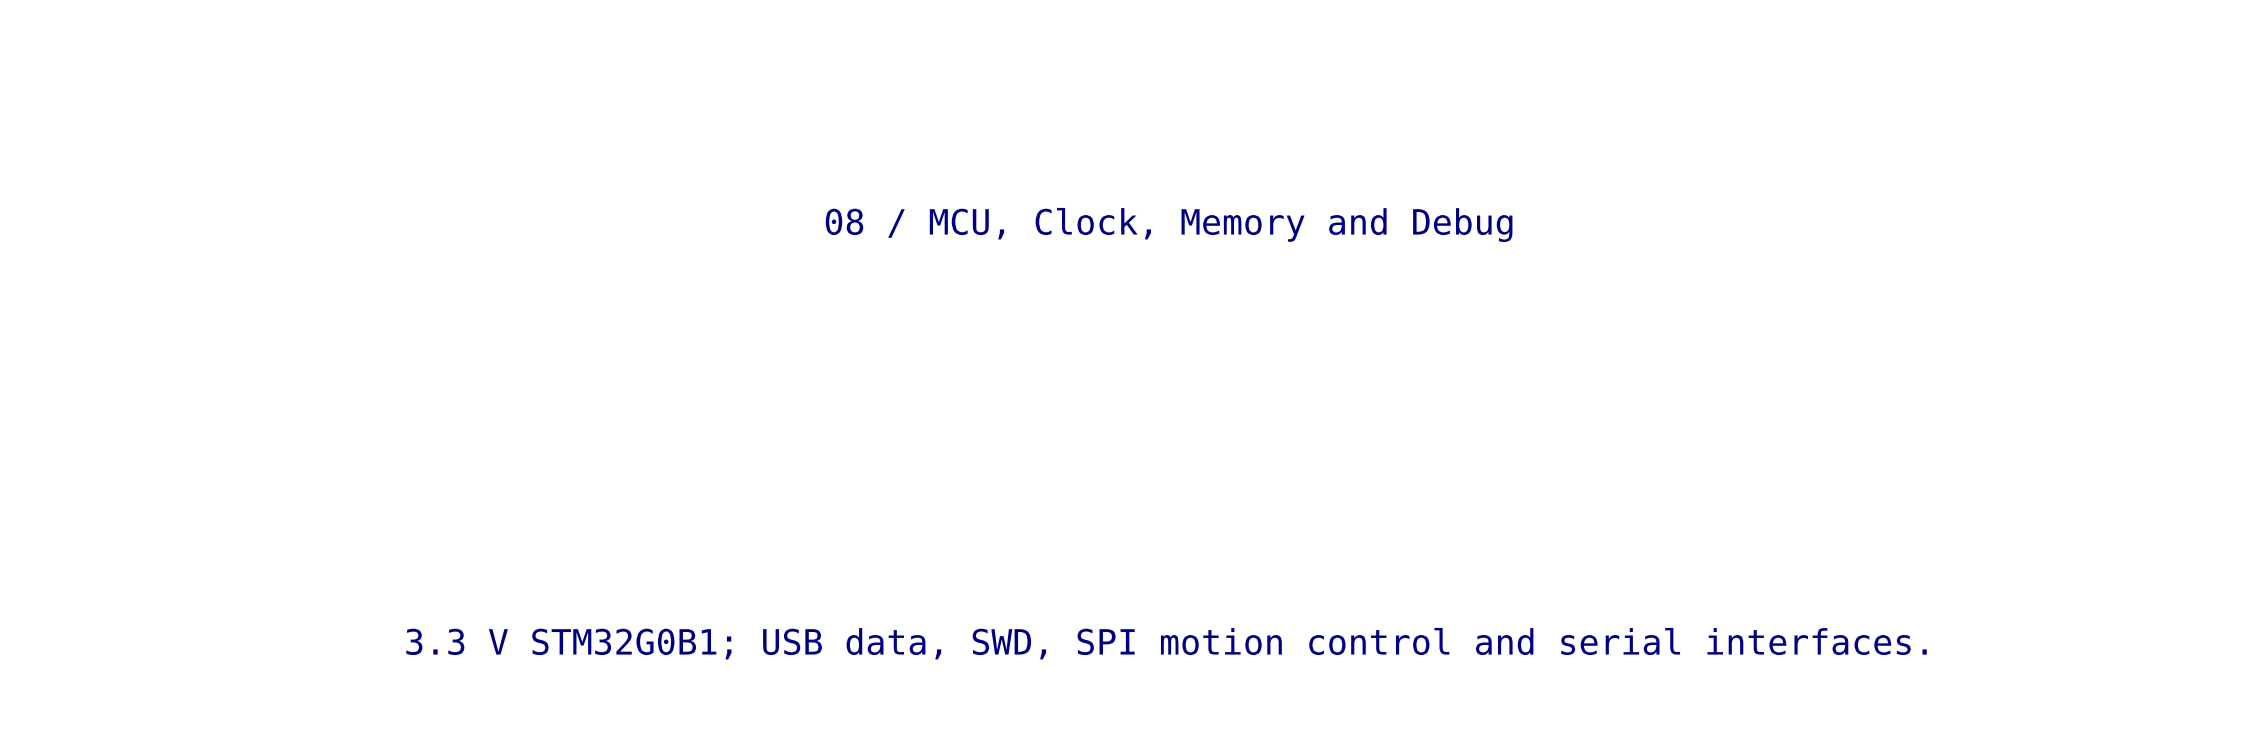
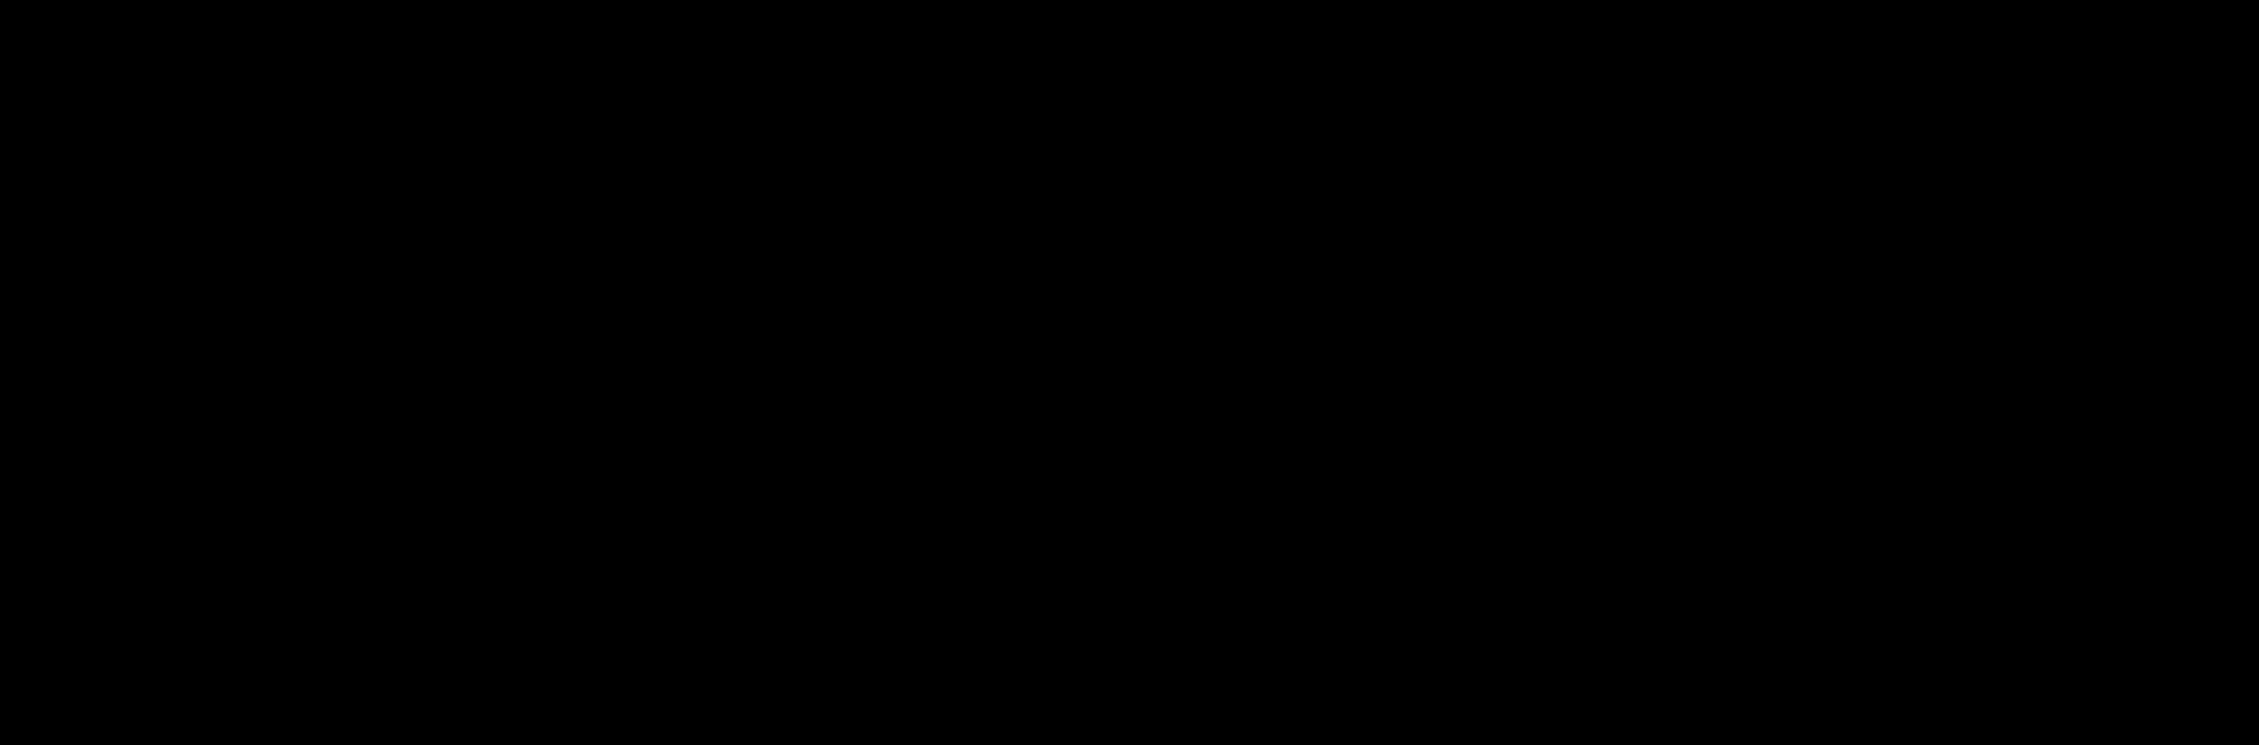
text: 08 / MCU, Clock, Memory and Debug (1169, 224) -> none
text: 3.3 V STM32G0B1; USB data, SWD, SPI motion control and serial interfaces. (1166, 643) -> none

